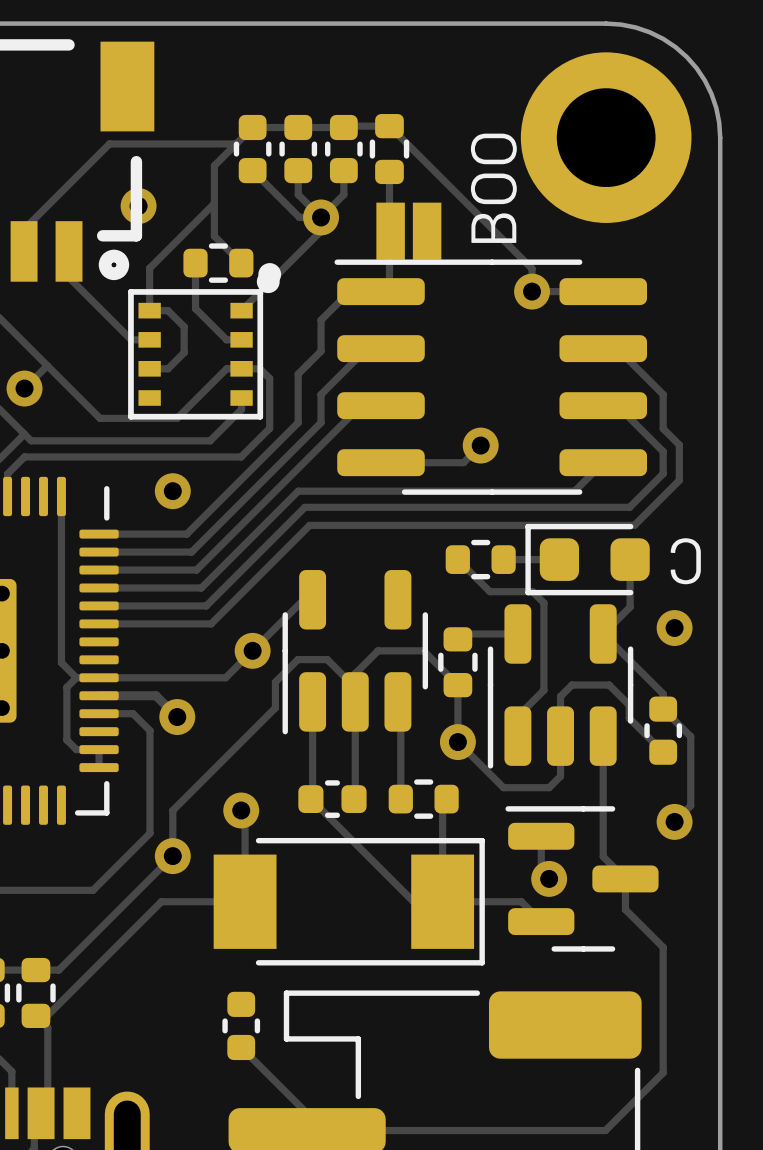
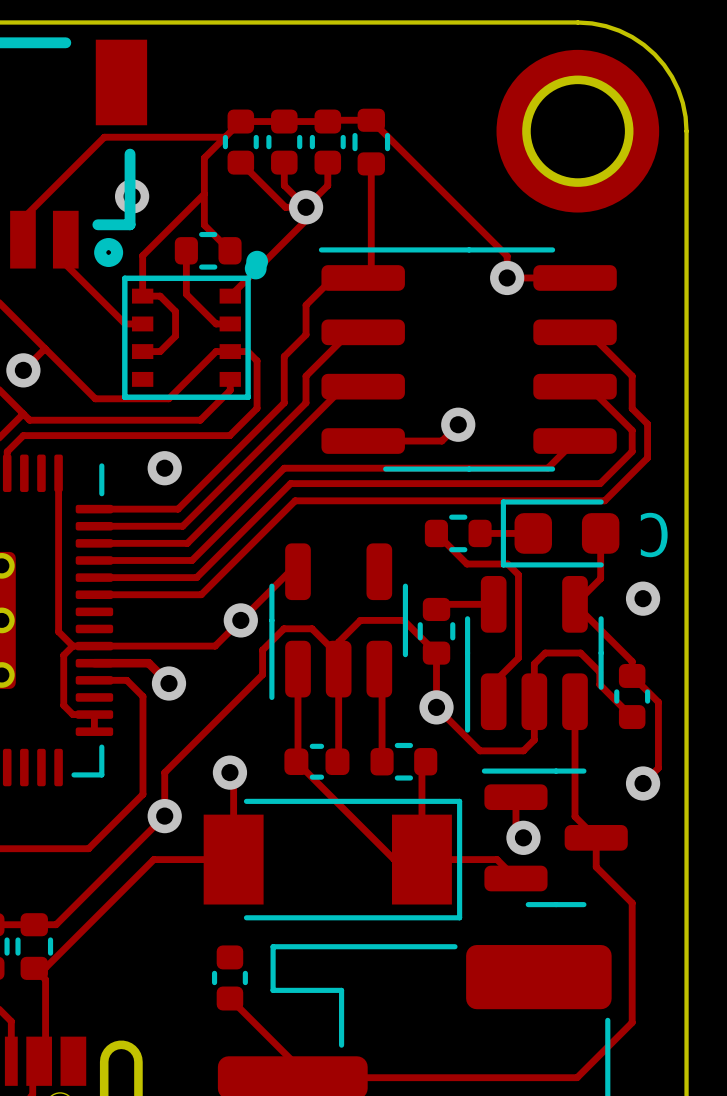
text: BOO (493, 188) -> none
part: (408, 231) -> none

